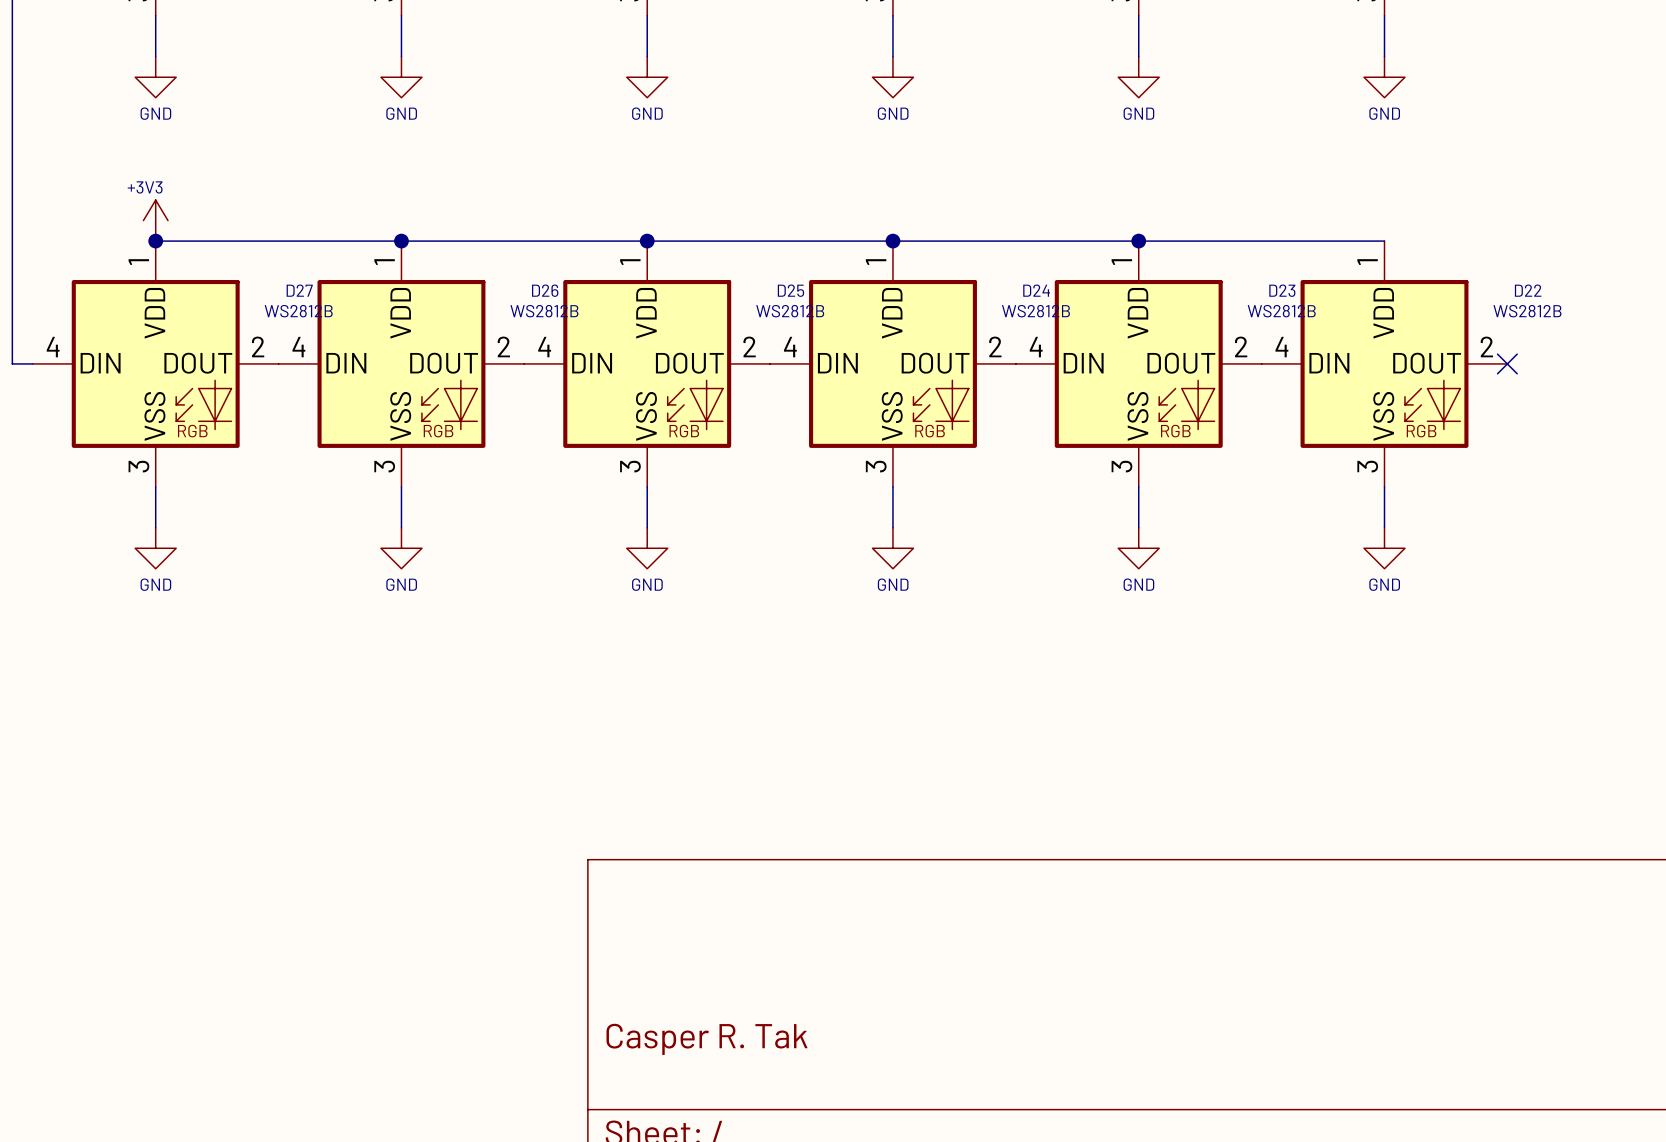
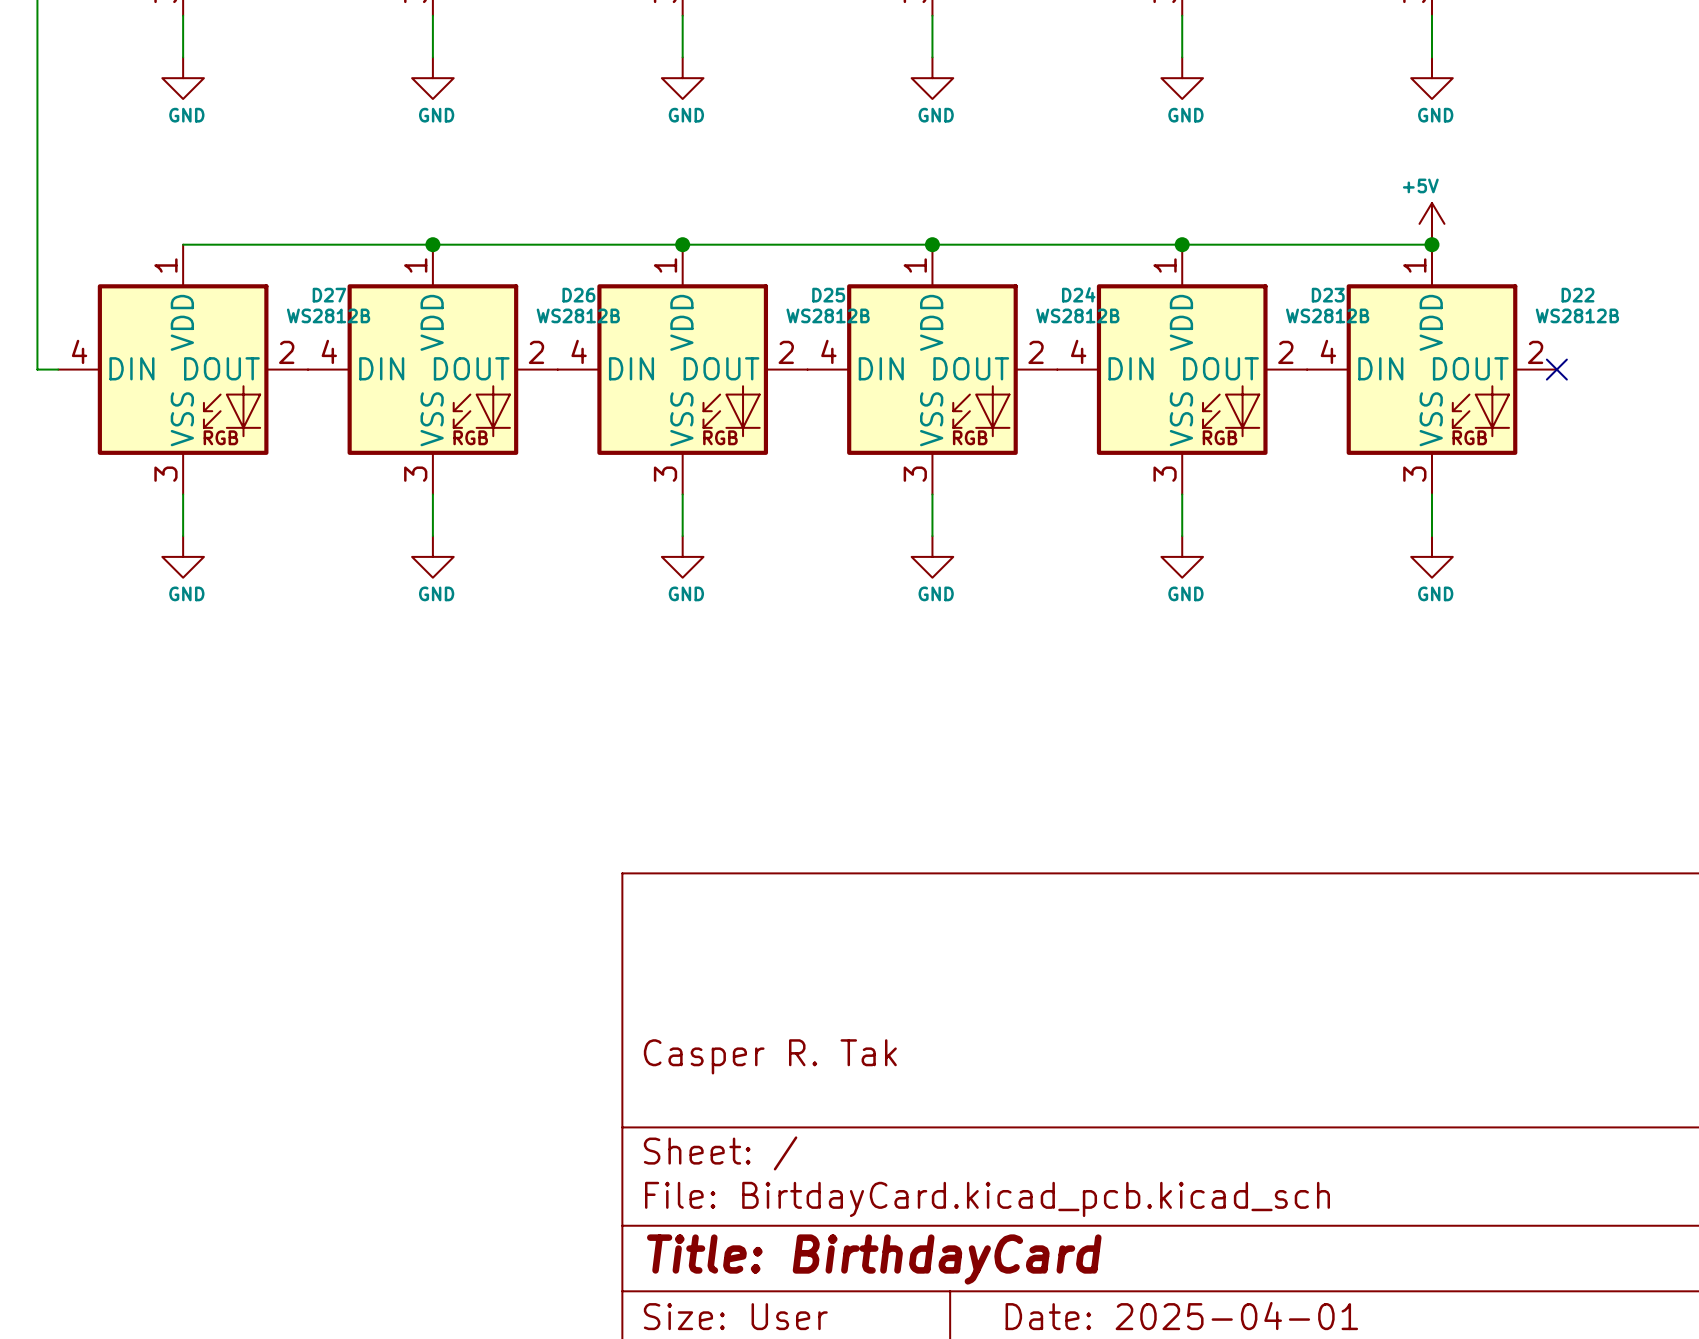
power symbol: +3V3 (155, 220) -> none
power symbol: none -> +5V (1431, 223)
junction: (155, 241) -> none
junction: none -> (1431, 244)

